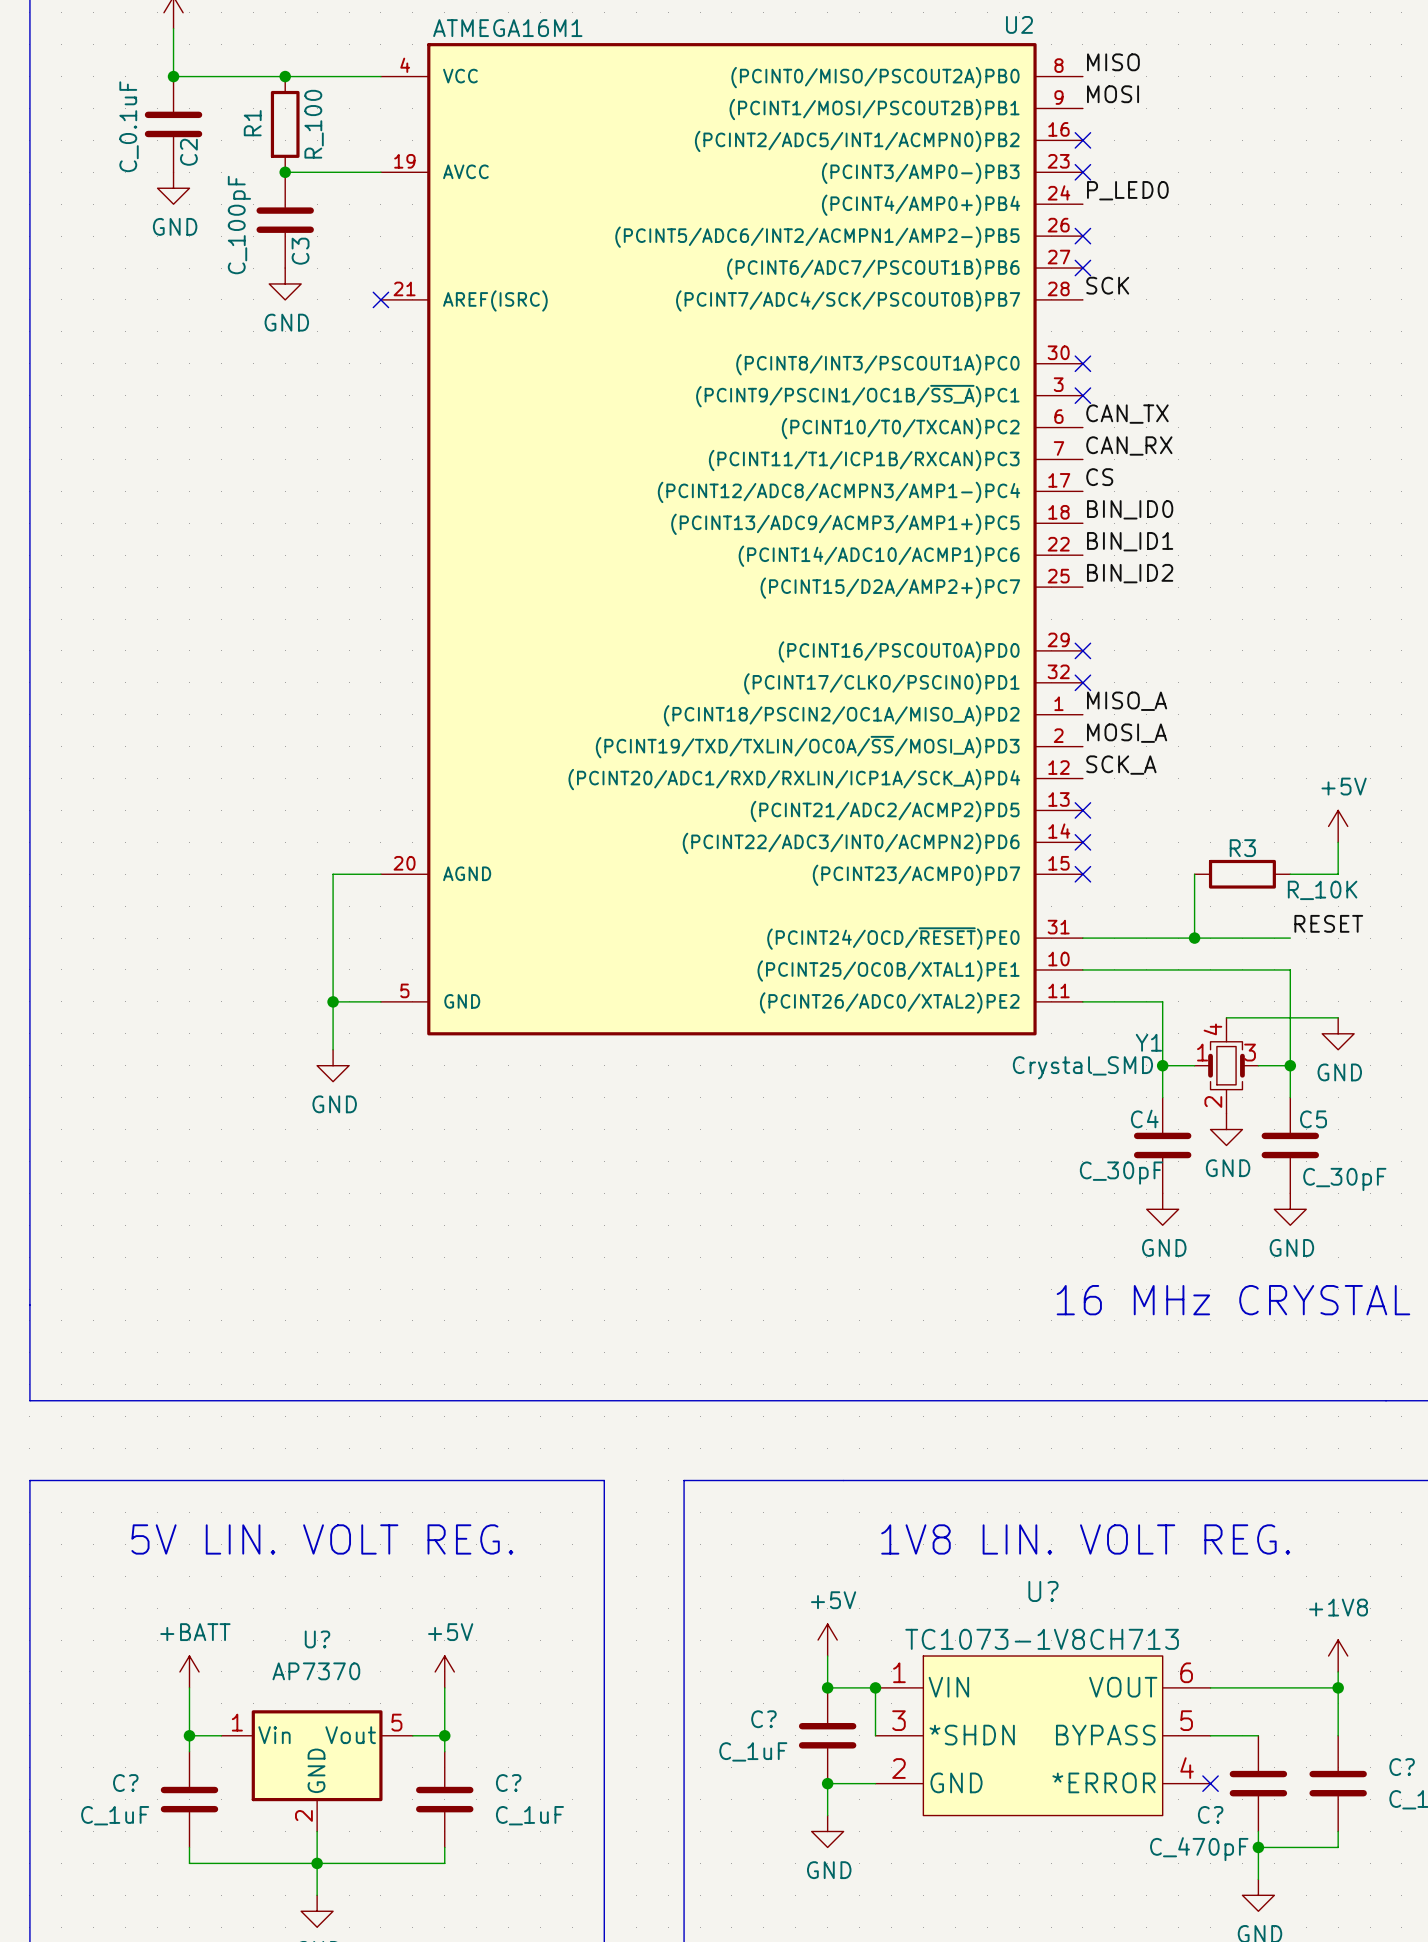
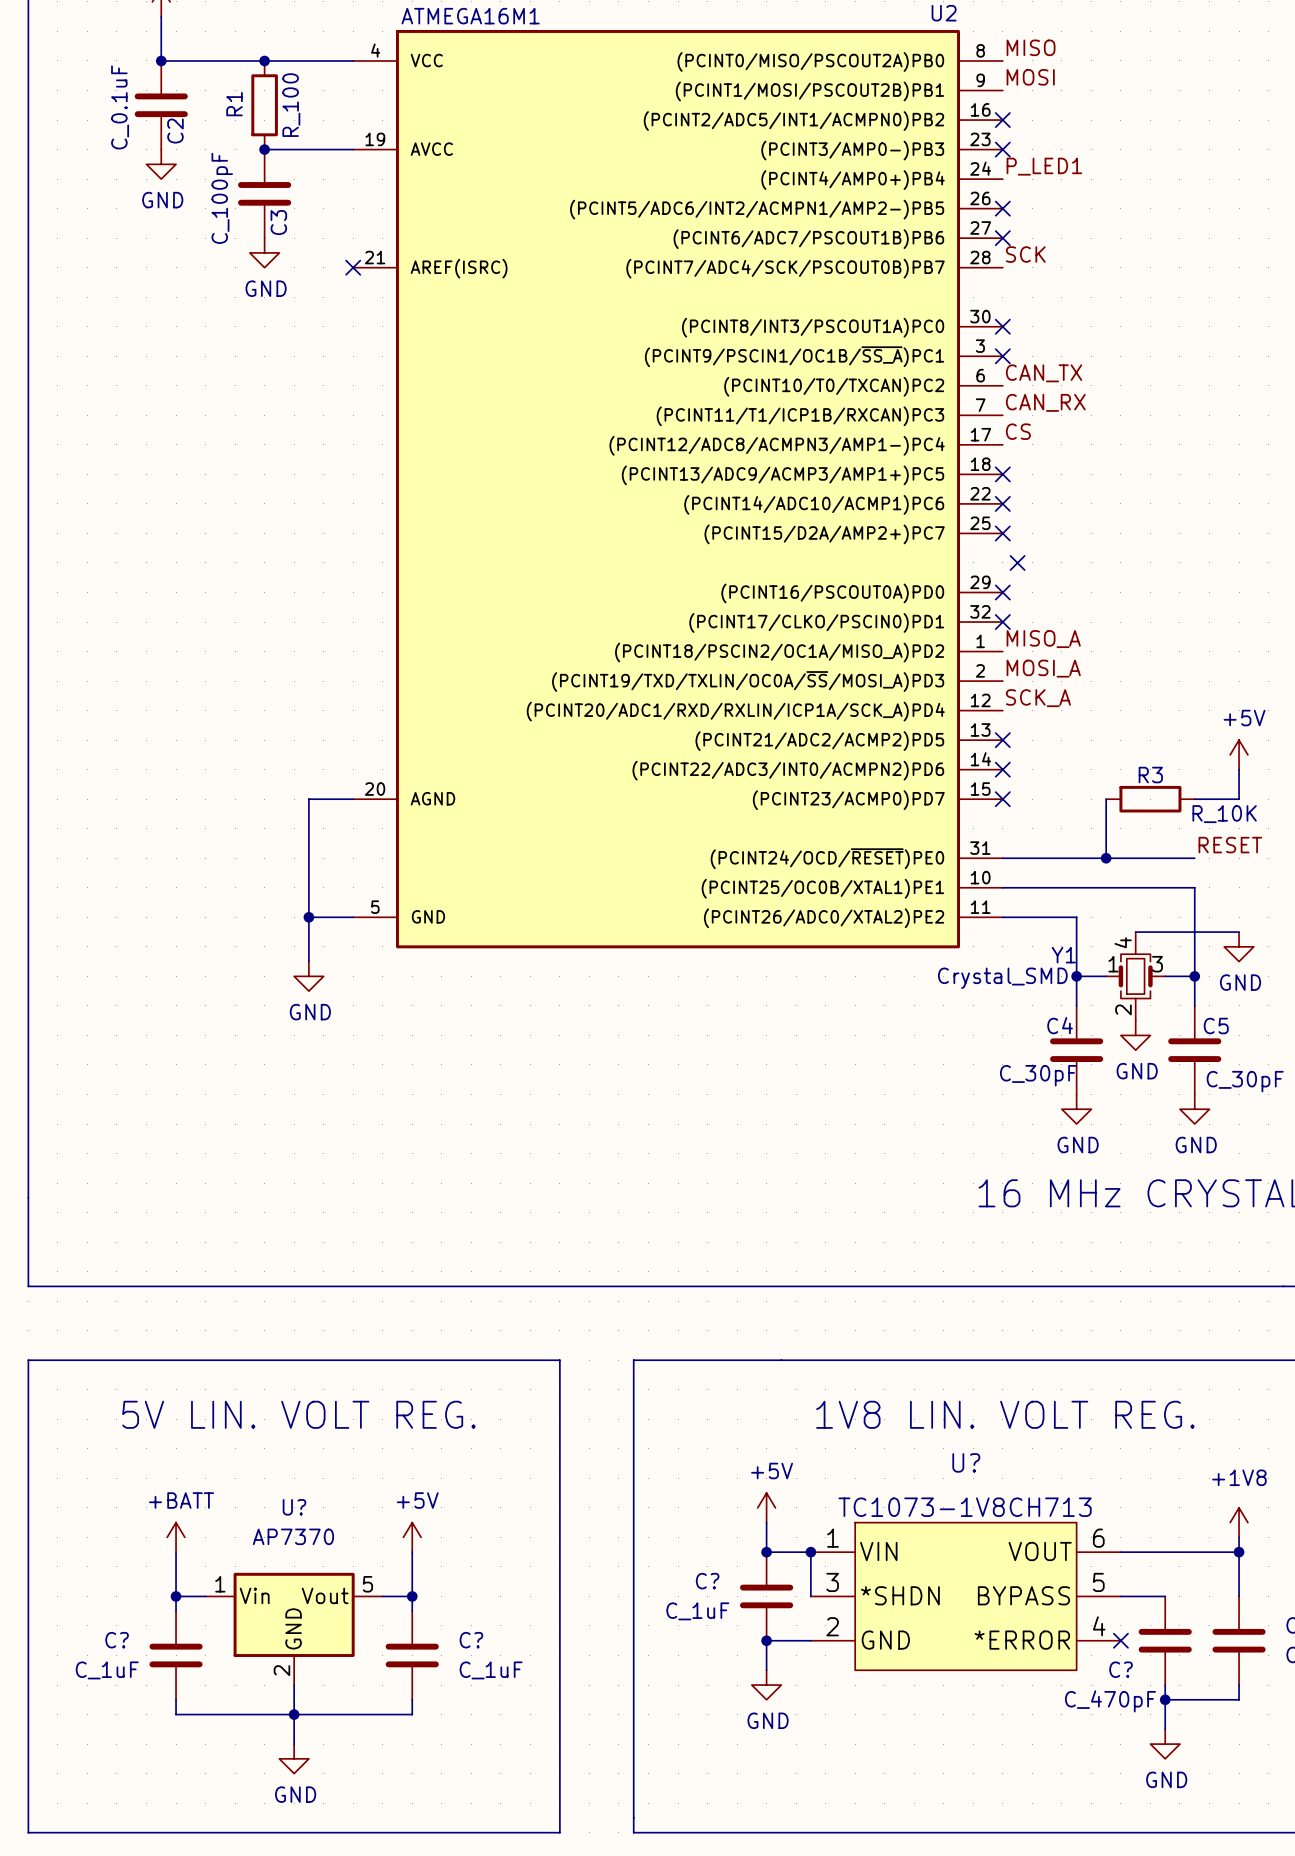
label: P_LED0 (1127, 190) -> P_LED1 (1044, 166)
label: BIN_ID0 (1130, 509) -> none
no-connect mark: none -> (1002, 474)
label: BIN_ID1 (1130, 541) -> none
no-connect mark: none -> (1002, 503)
label: BIN_ID2 (1130, 573) -> none
no-connect mark: none -> (1002, 533)
no-connect mark: none -> (1017, 562)

